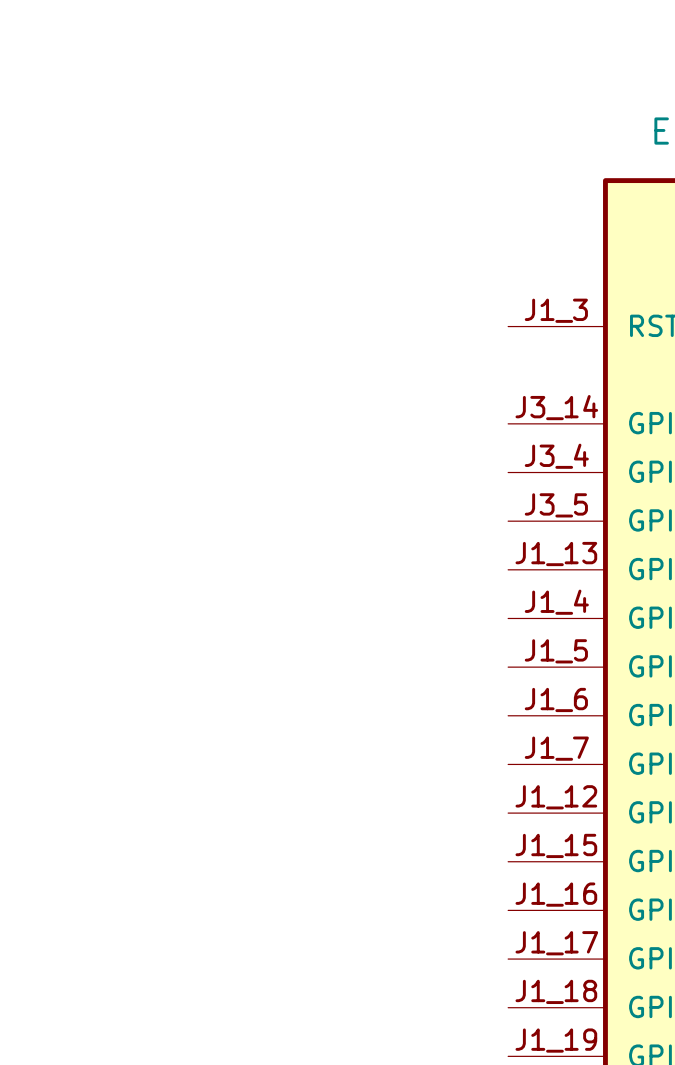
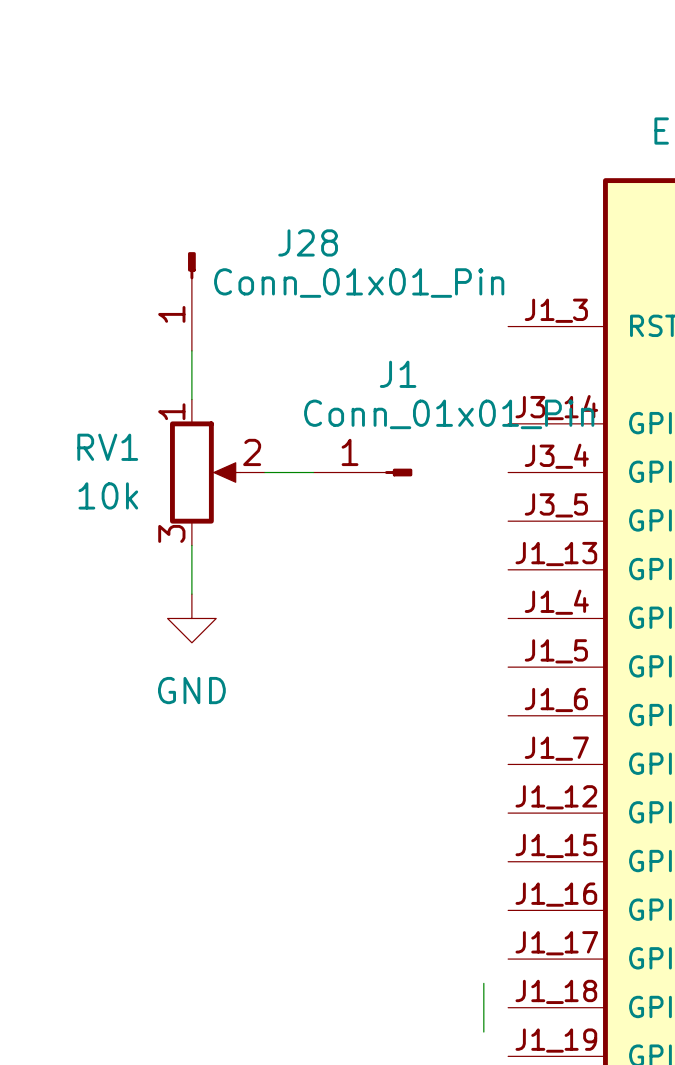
J28: none -> Conn_01x01_Pin (191, 301)
wire: none -> (191, 350) (191, 399)
RV1: none -> 10k (217, 472)
wire: none -> (264, 472) (313, 472)
J1: none -> Conn_01x01_Pin (362, 472)
wire: none -> (191, 545) (191, 594)
power symbol: none -> GND (191, 618)
wire: none -> (483, 983) (483, 1032)

